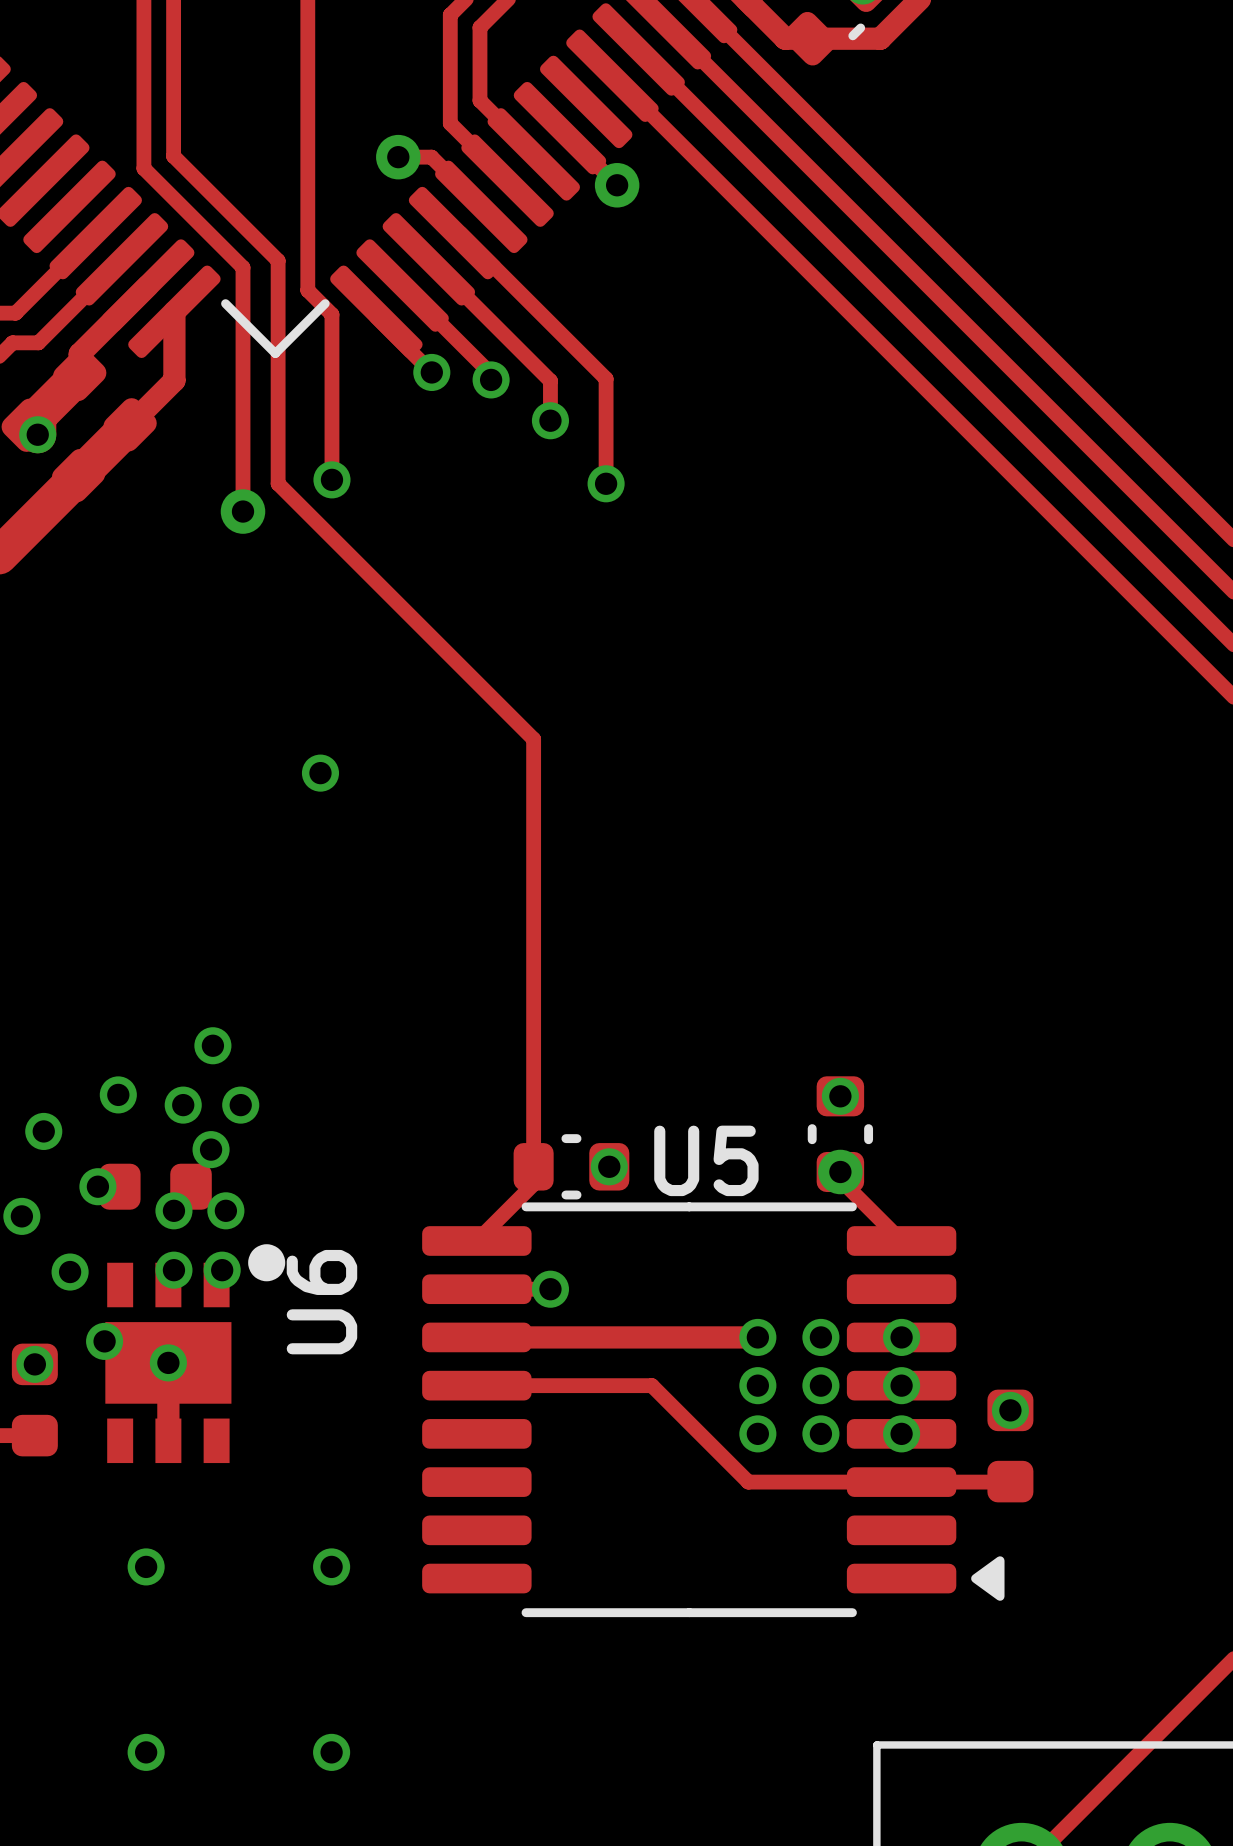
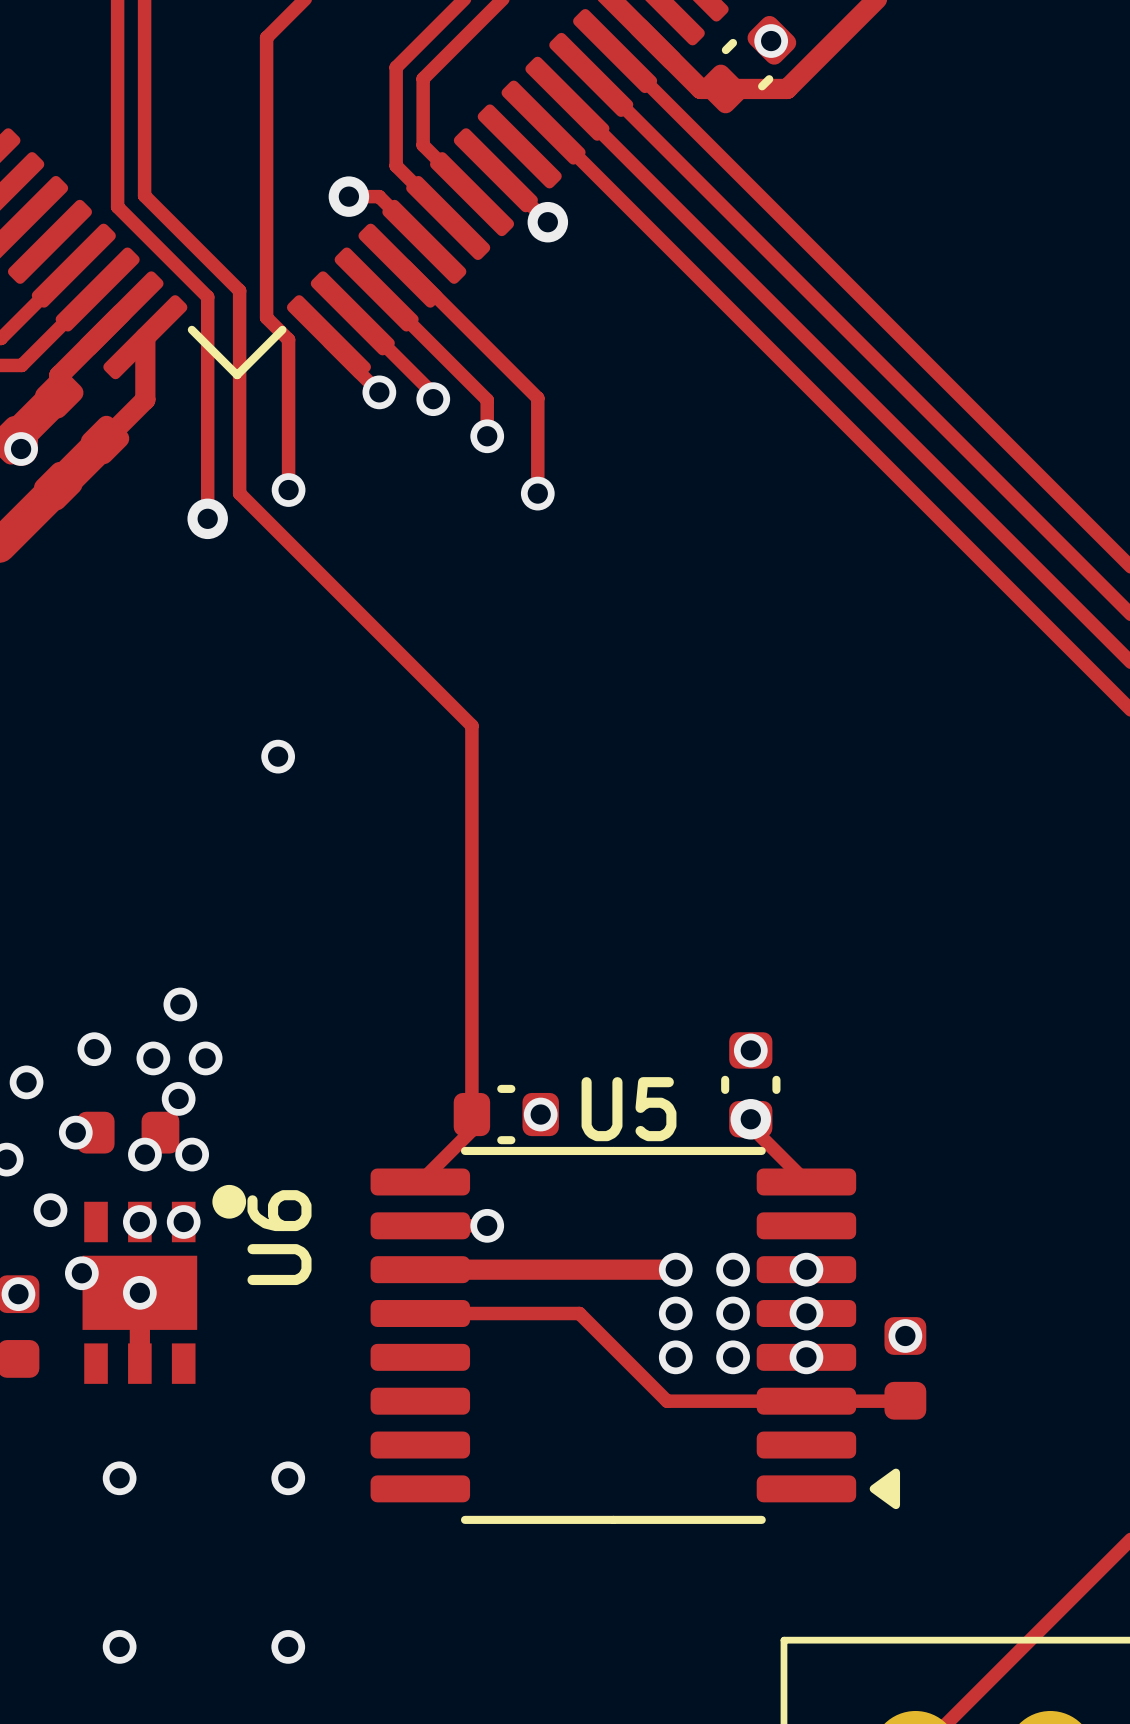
via position: (173, 1270) -> (139, 1222)
via position: (222, 1270) -> (183, 1222)

